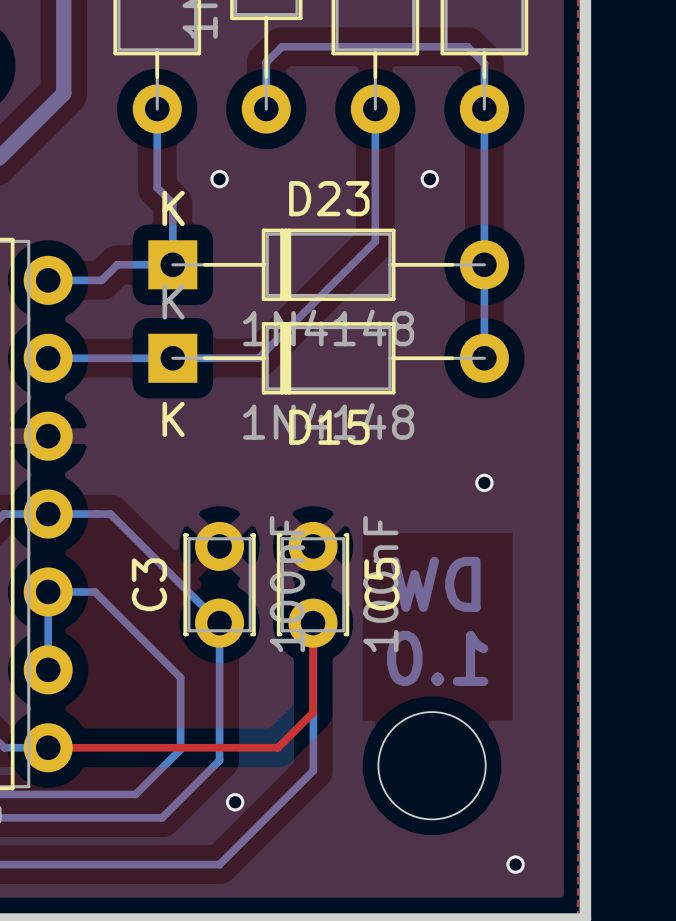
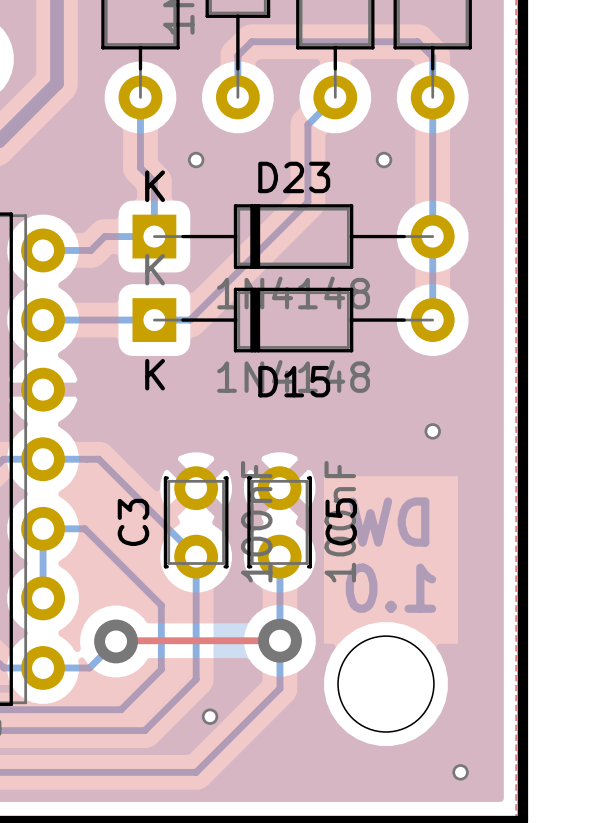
bottom track: (375, 109) (375, 241) (258, 358) (212, 358) -> (335, 97) (307, 124) (307, 202) (190, 320)
top track: (313, 623) (313, 712) (277, 747) (48, 747) -> none
top track: none -> (279, 640) (116, 641)
via: none -> (279, 640)
bottom track: none -> (116, 641) (89, 667) (43, 667)
via: none -> (116, 641)

